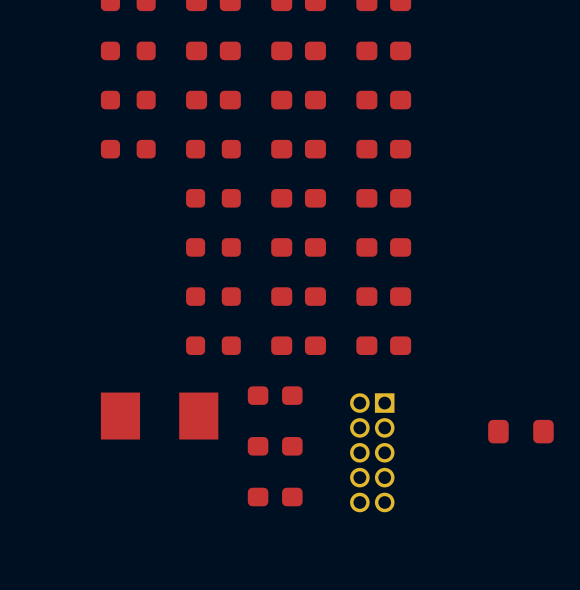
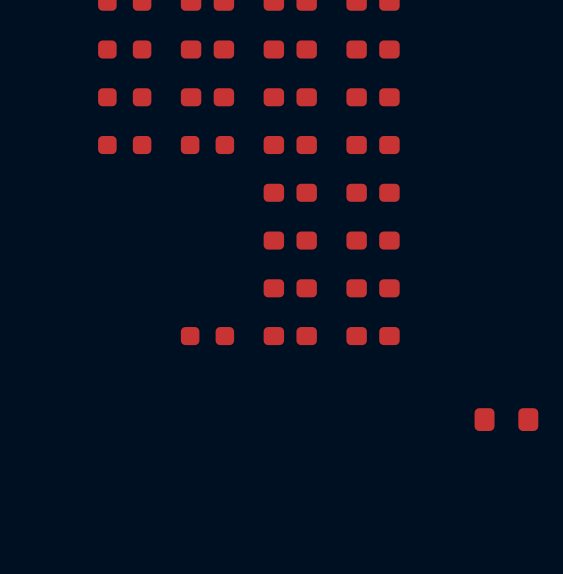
part: (213, 198) -> none
part: (213, 247) -> none
part: (213, 296) -> none
part: (275, 395) -> none
part: (159, 416) -> none
part: (275, 446) -> none
part: (372, 452) -> none
part: (275, 497) -> none

